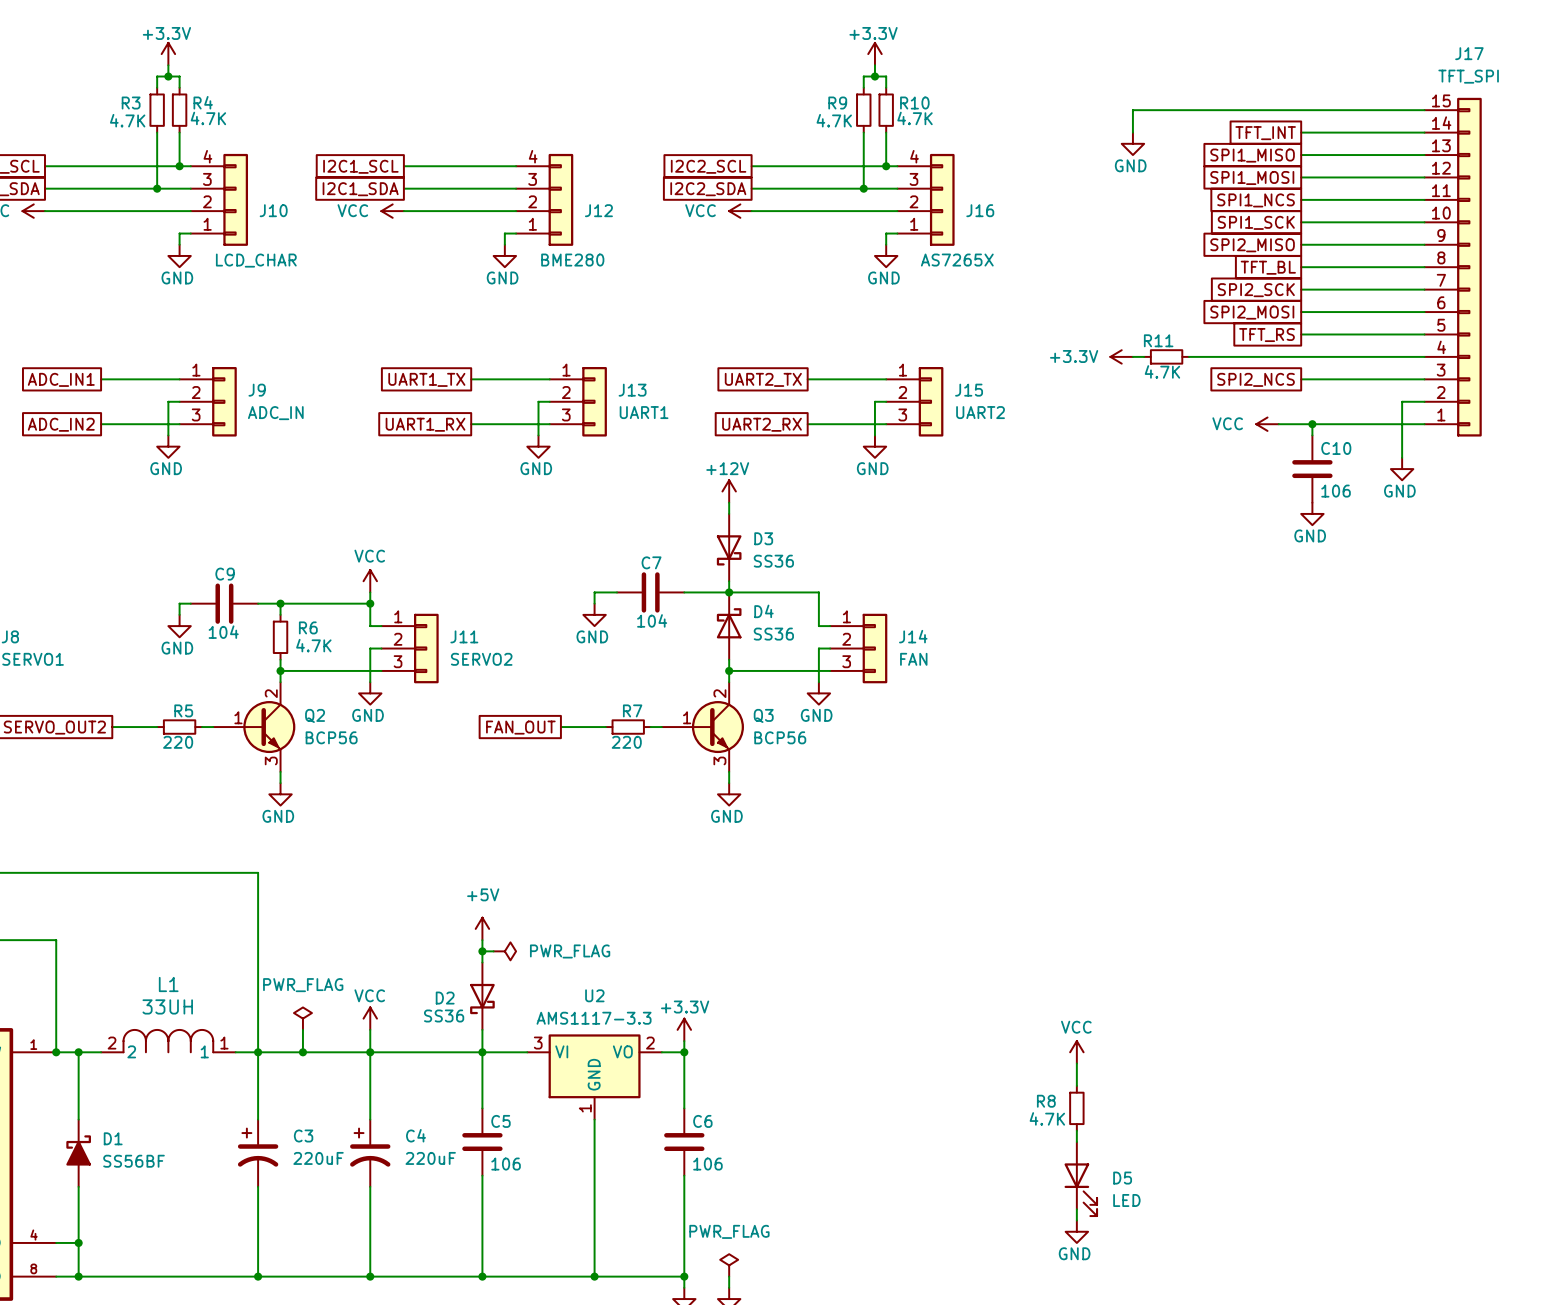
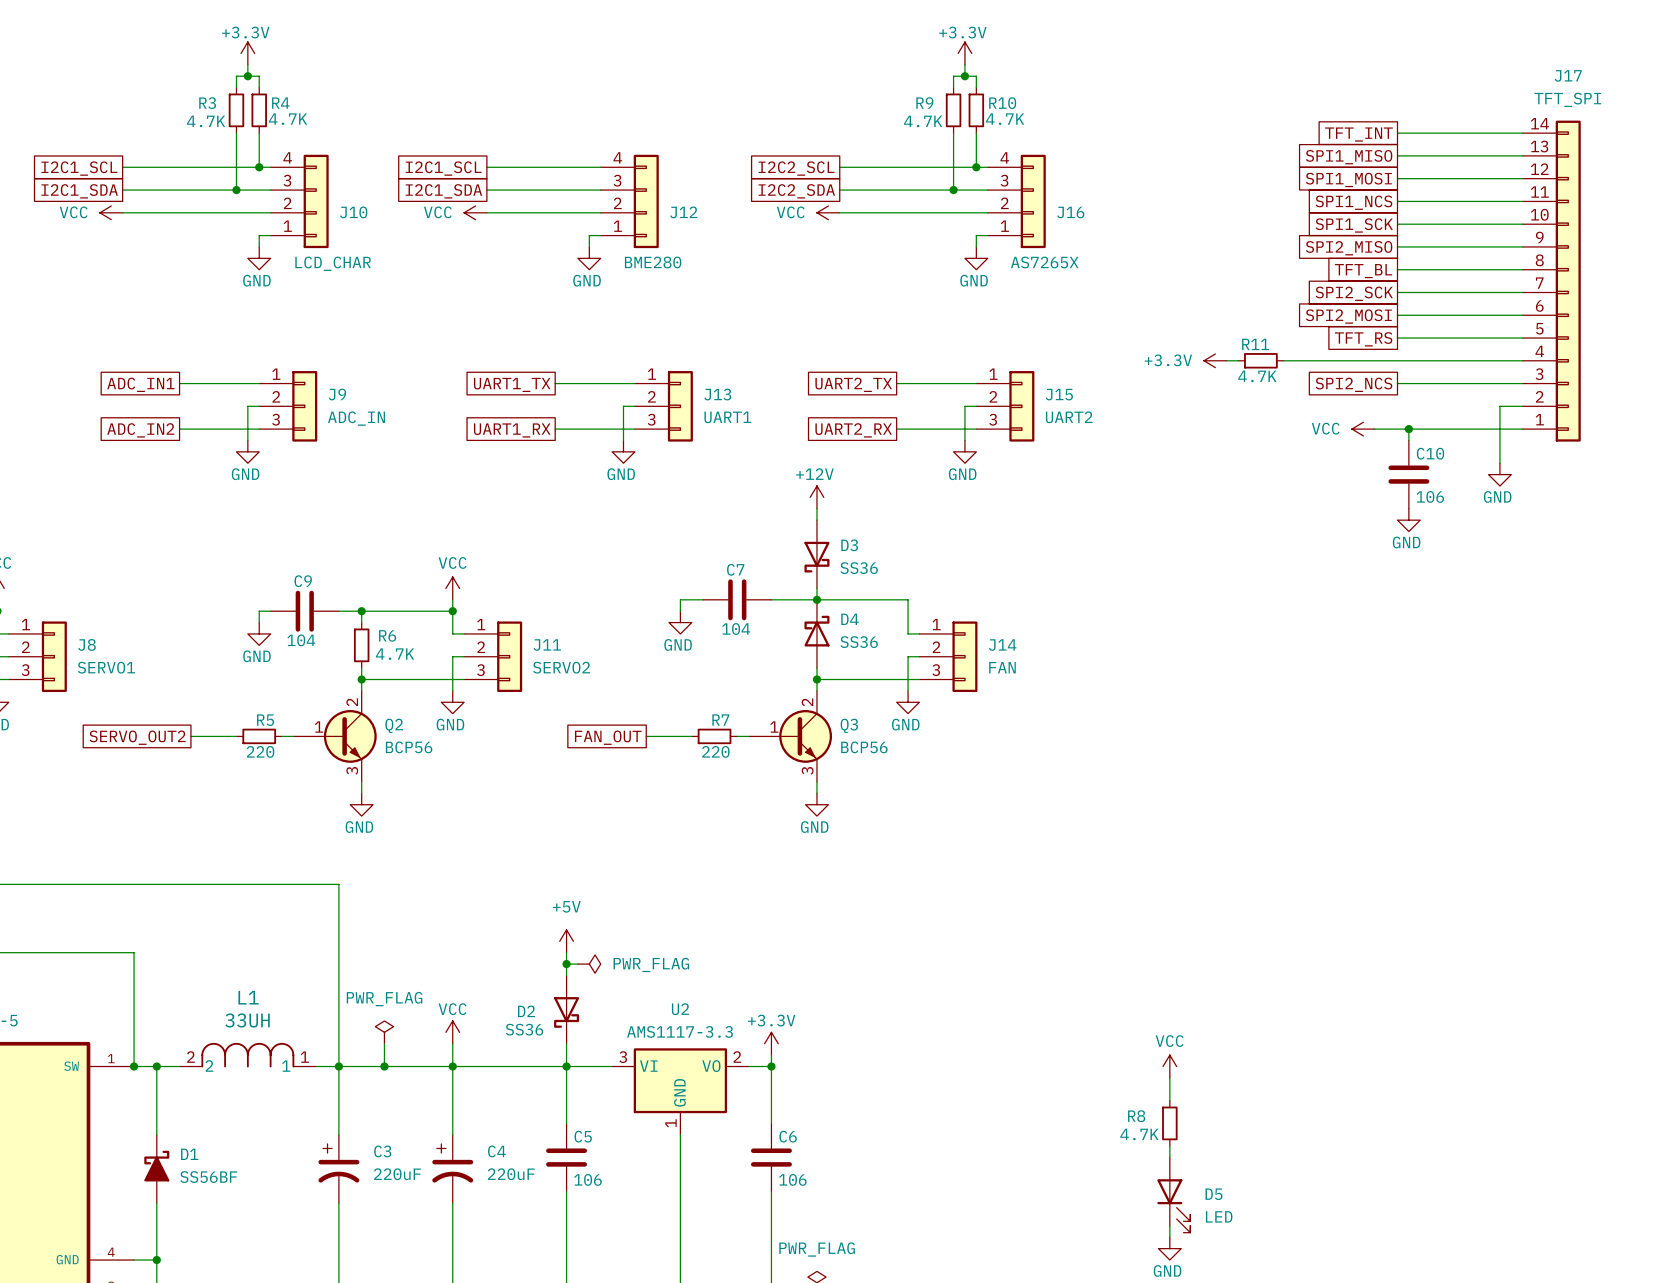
J17 symbol: [1424, 97, 1482, 437] -> [1522, 120, 1581, 442]
wire: (1424, 110) (1132, 110) (1132, 132) -> none
power symbol: GND (1132, 143) -> none

